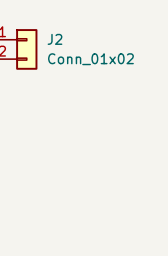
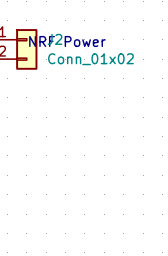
text: none -> NRF Power (67, 41)

